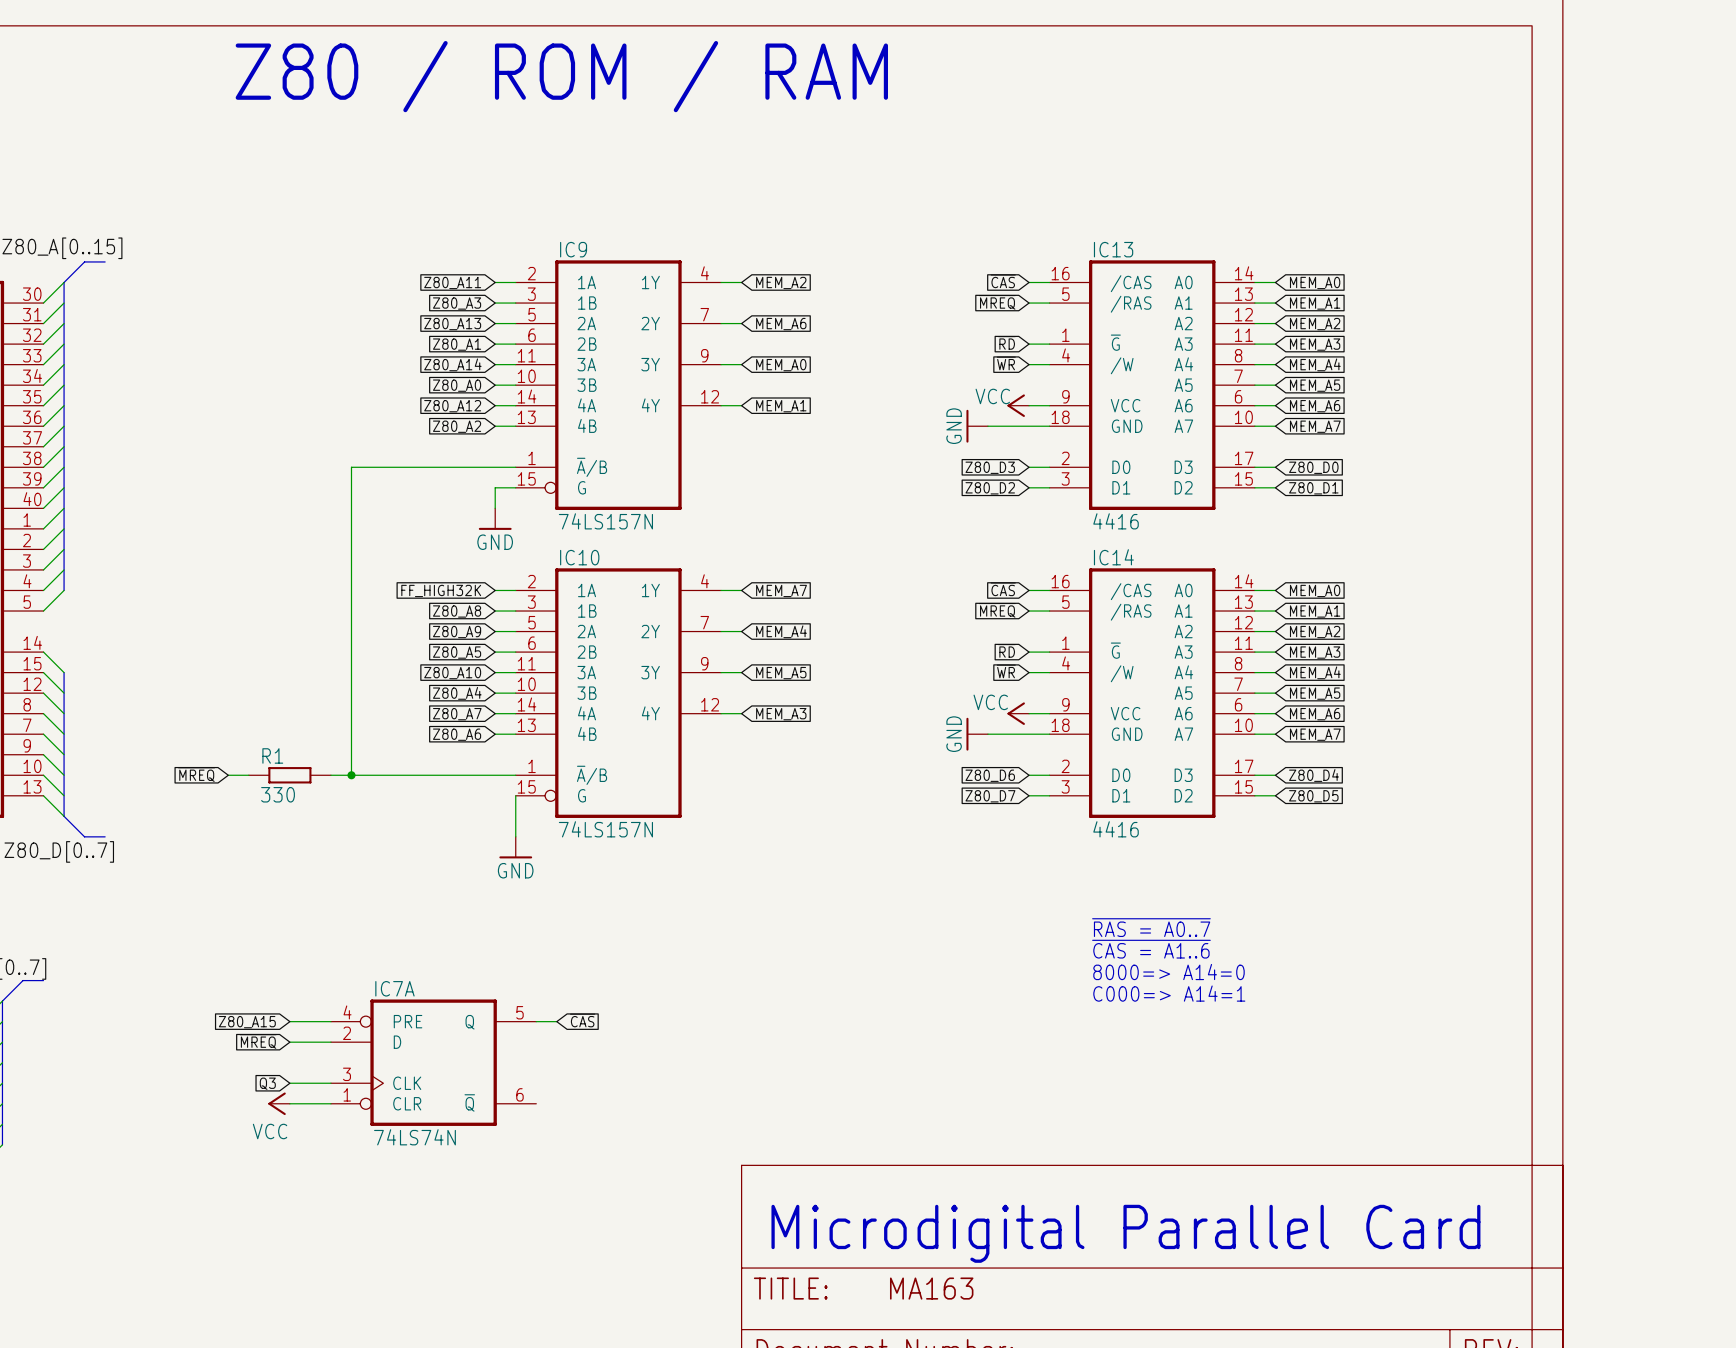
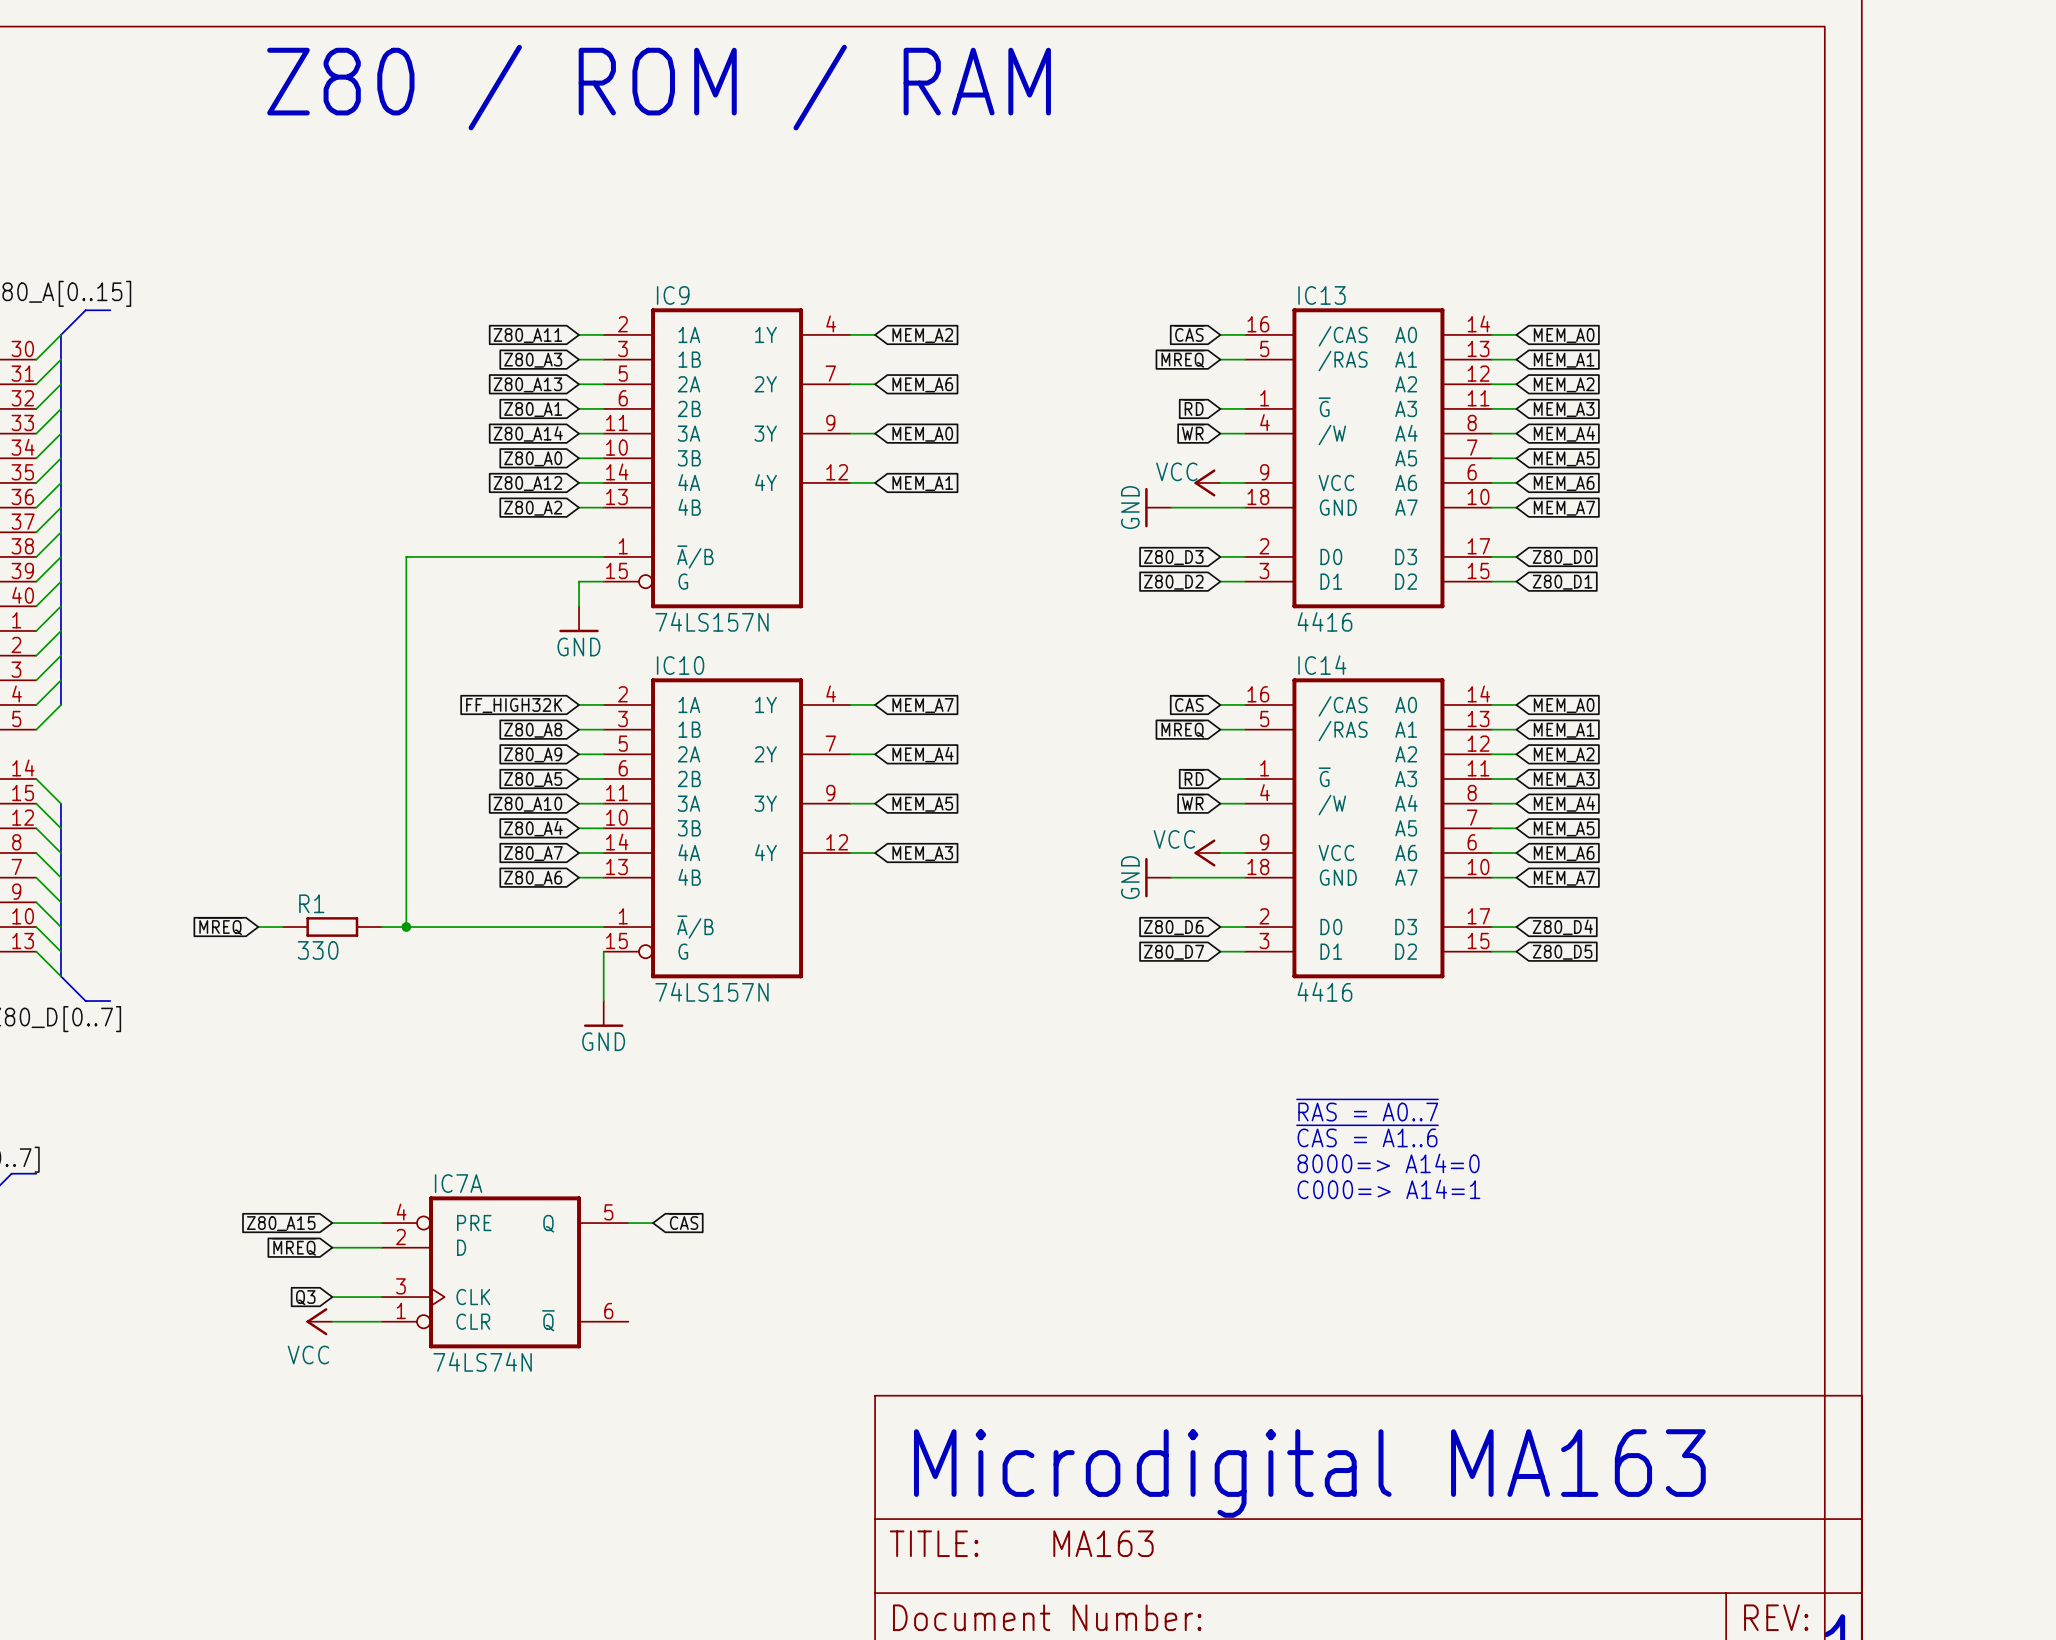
text: Microdigital Parallel Card (1125, 1233) -> Microdigital MA163 (1309, 1473)

